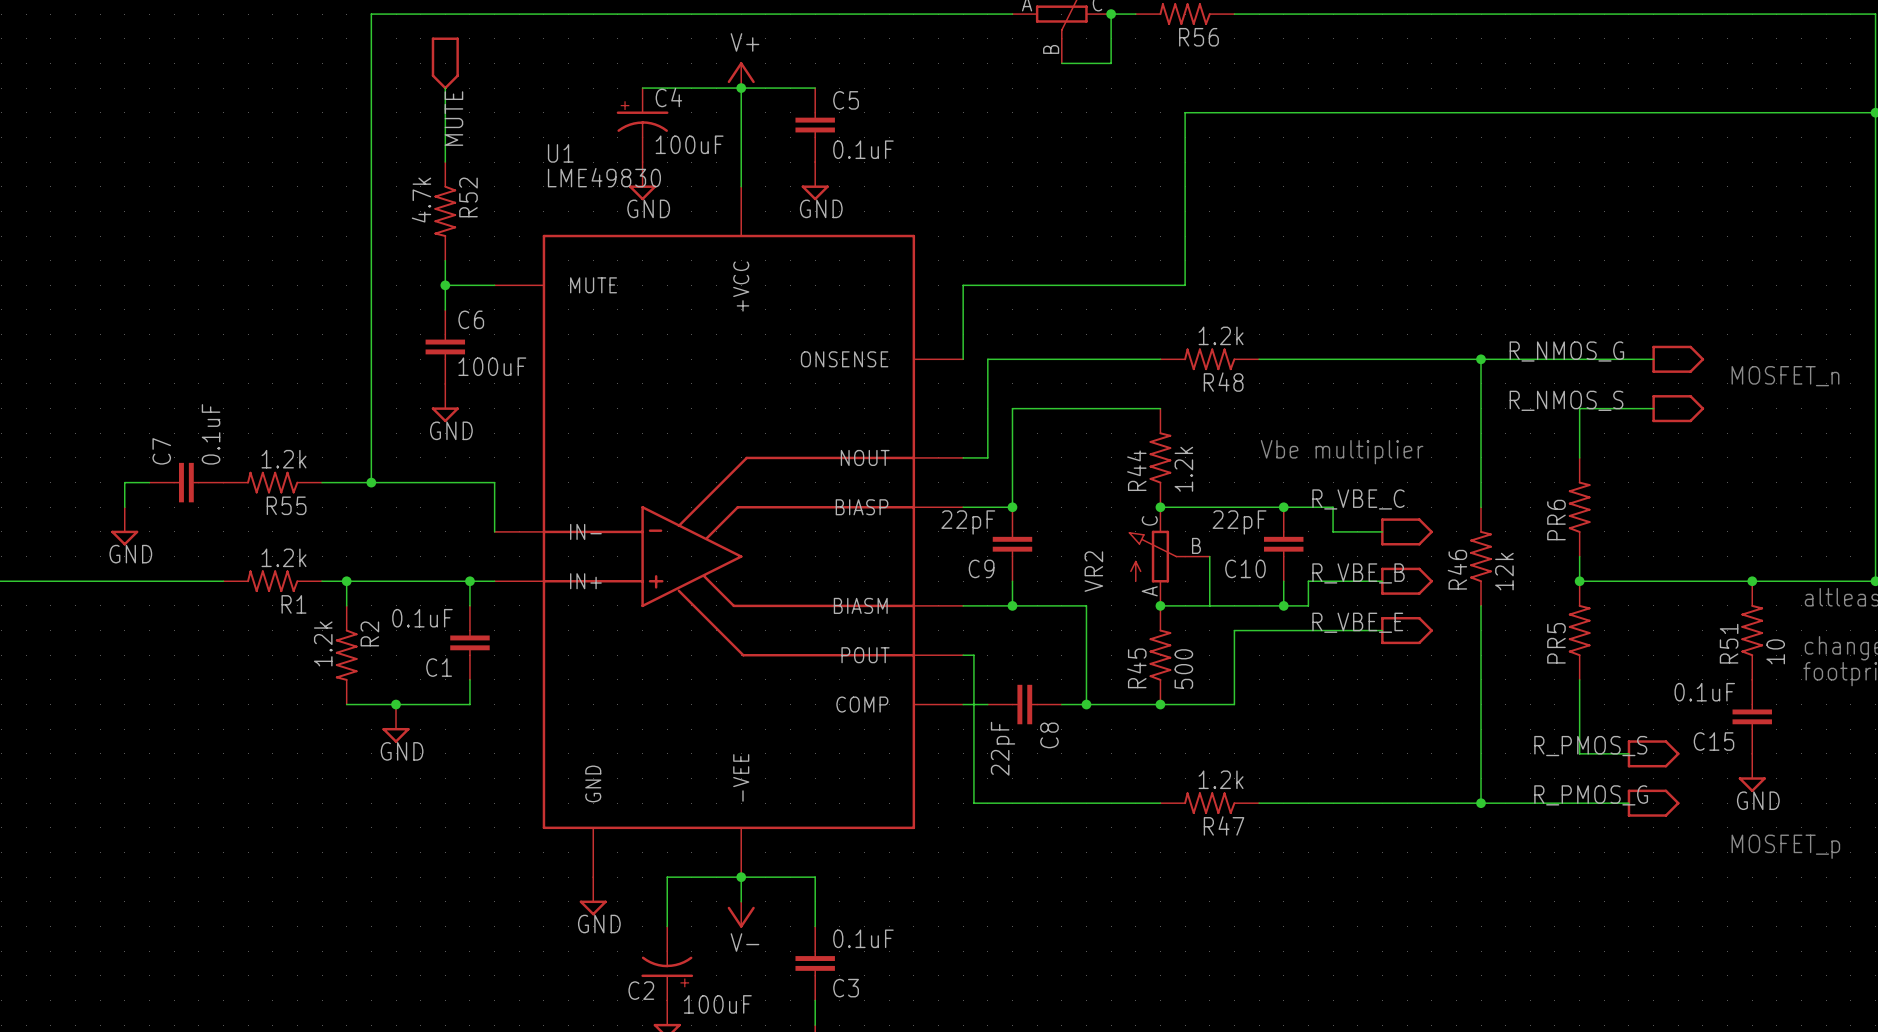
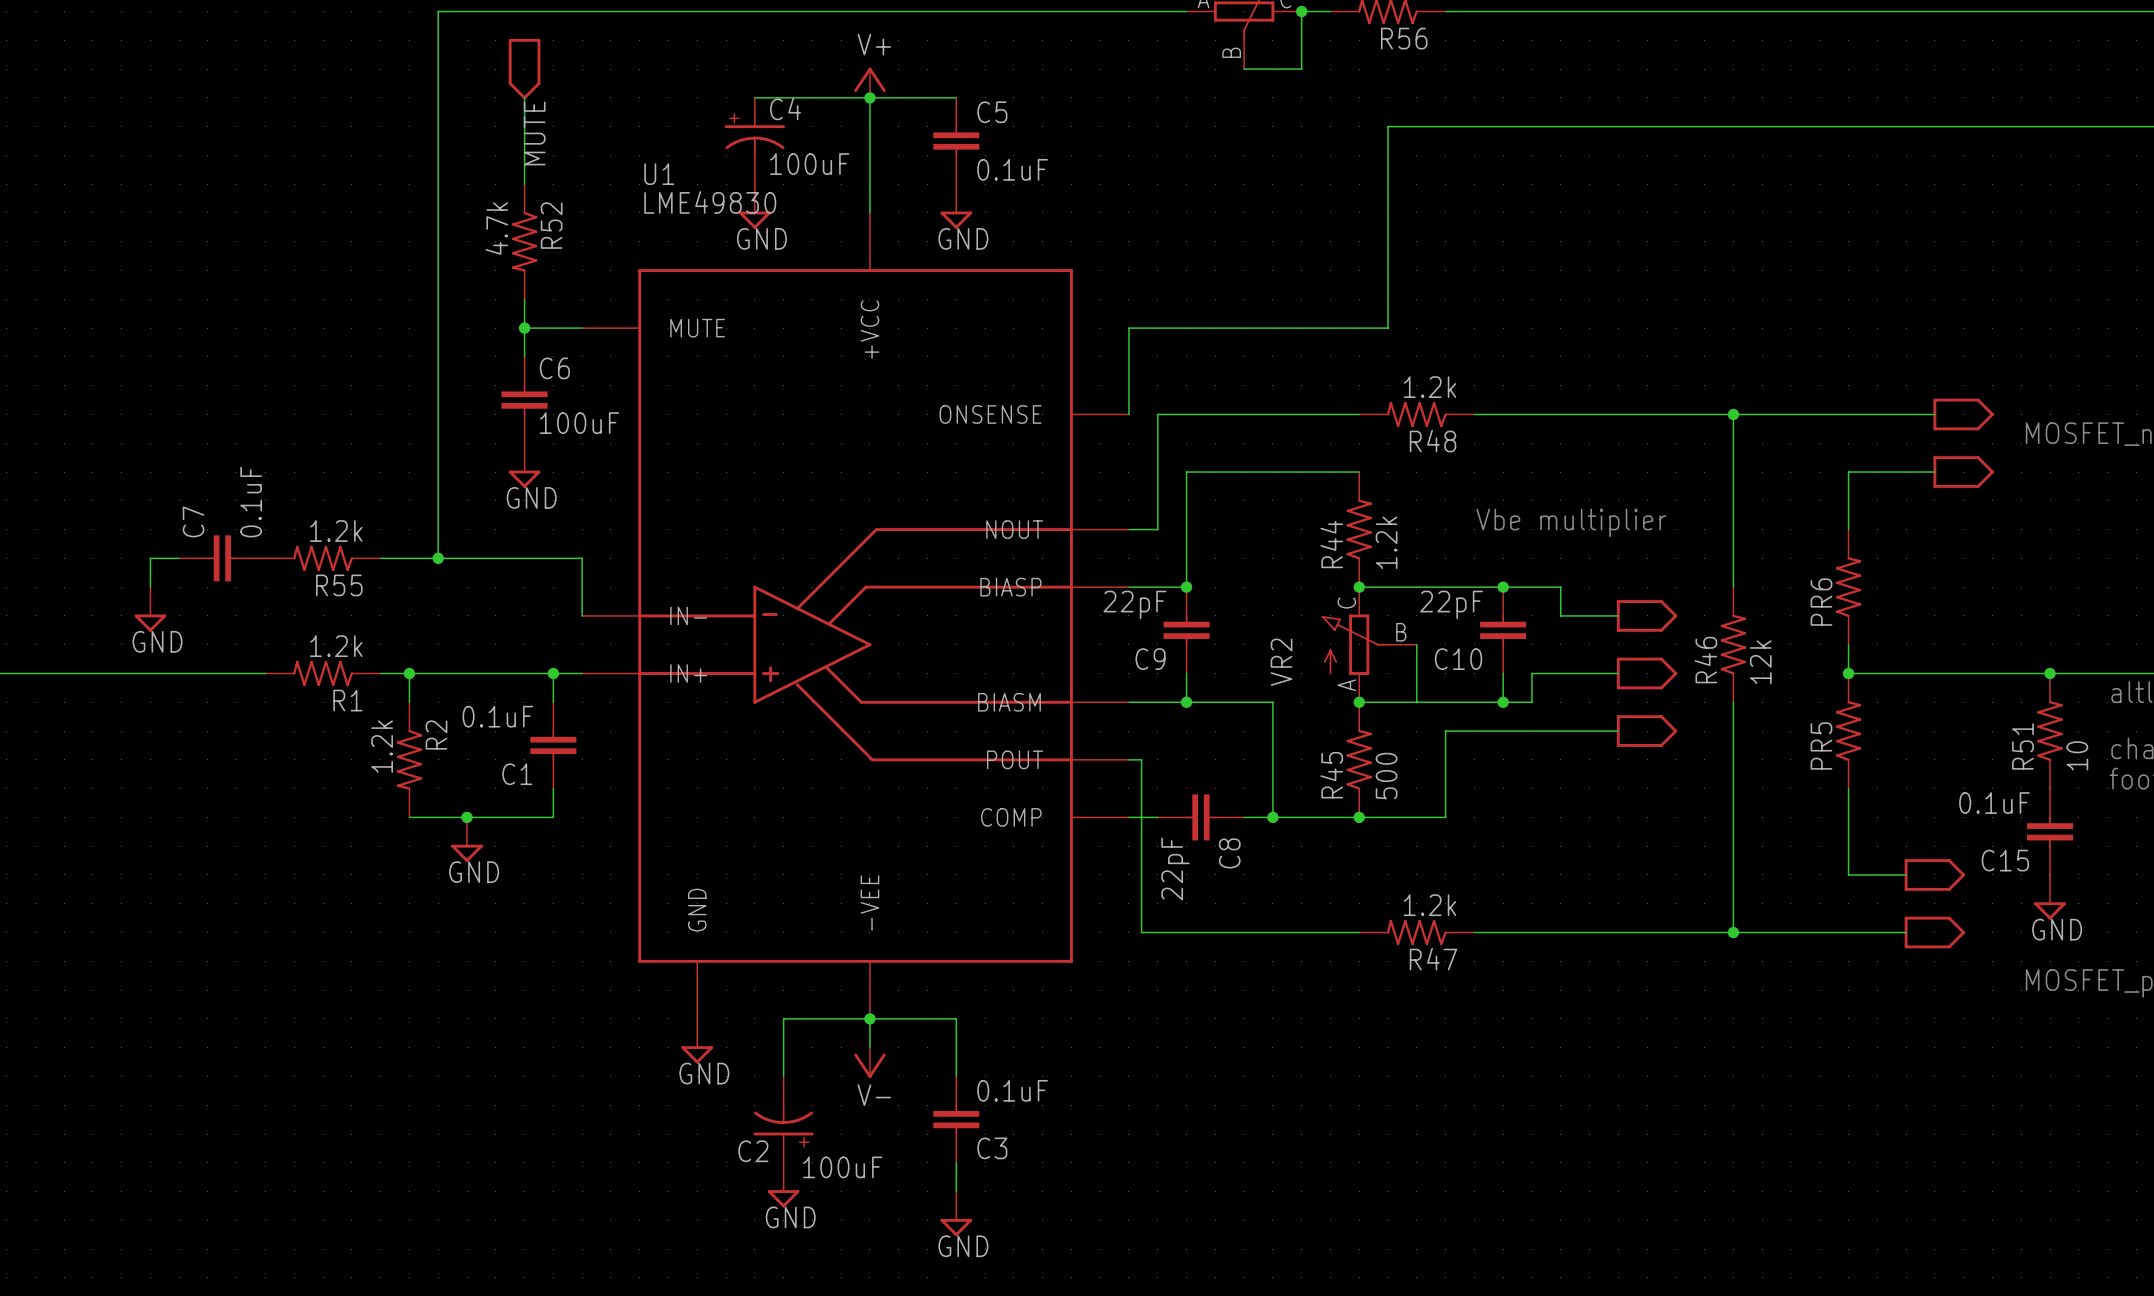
label: R_NMOS_G (1566, 351) -> none
label: R_NMOS_S (1566, 400) -> none
label: R_VBE_C (1358, 499) -> none
label: R_VBE_B (1358, 573) -> none
label: R_VBE_E (1357, 622) -> none
label: R_PMOS_S (1590, 746) -> none
label: R_PMOS_G (1591, 795) -> none

